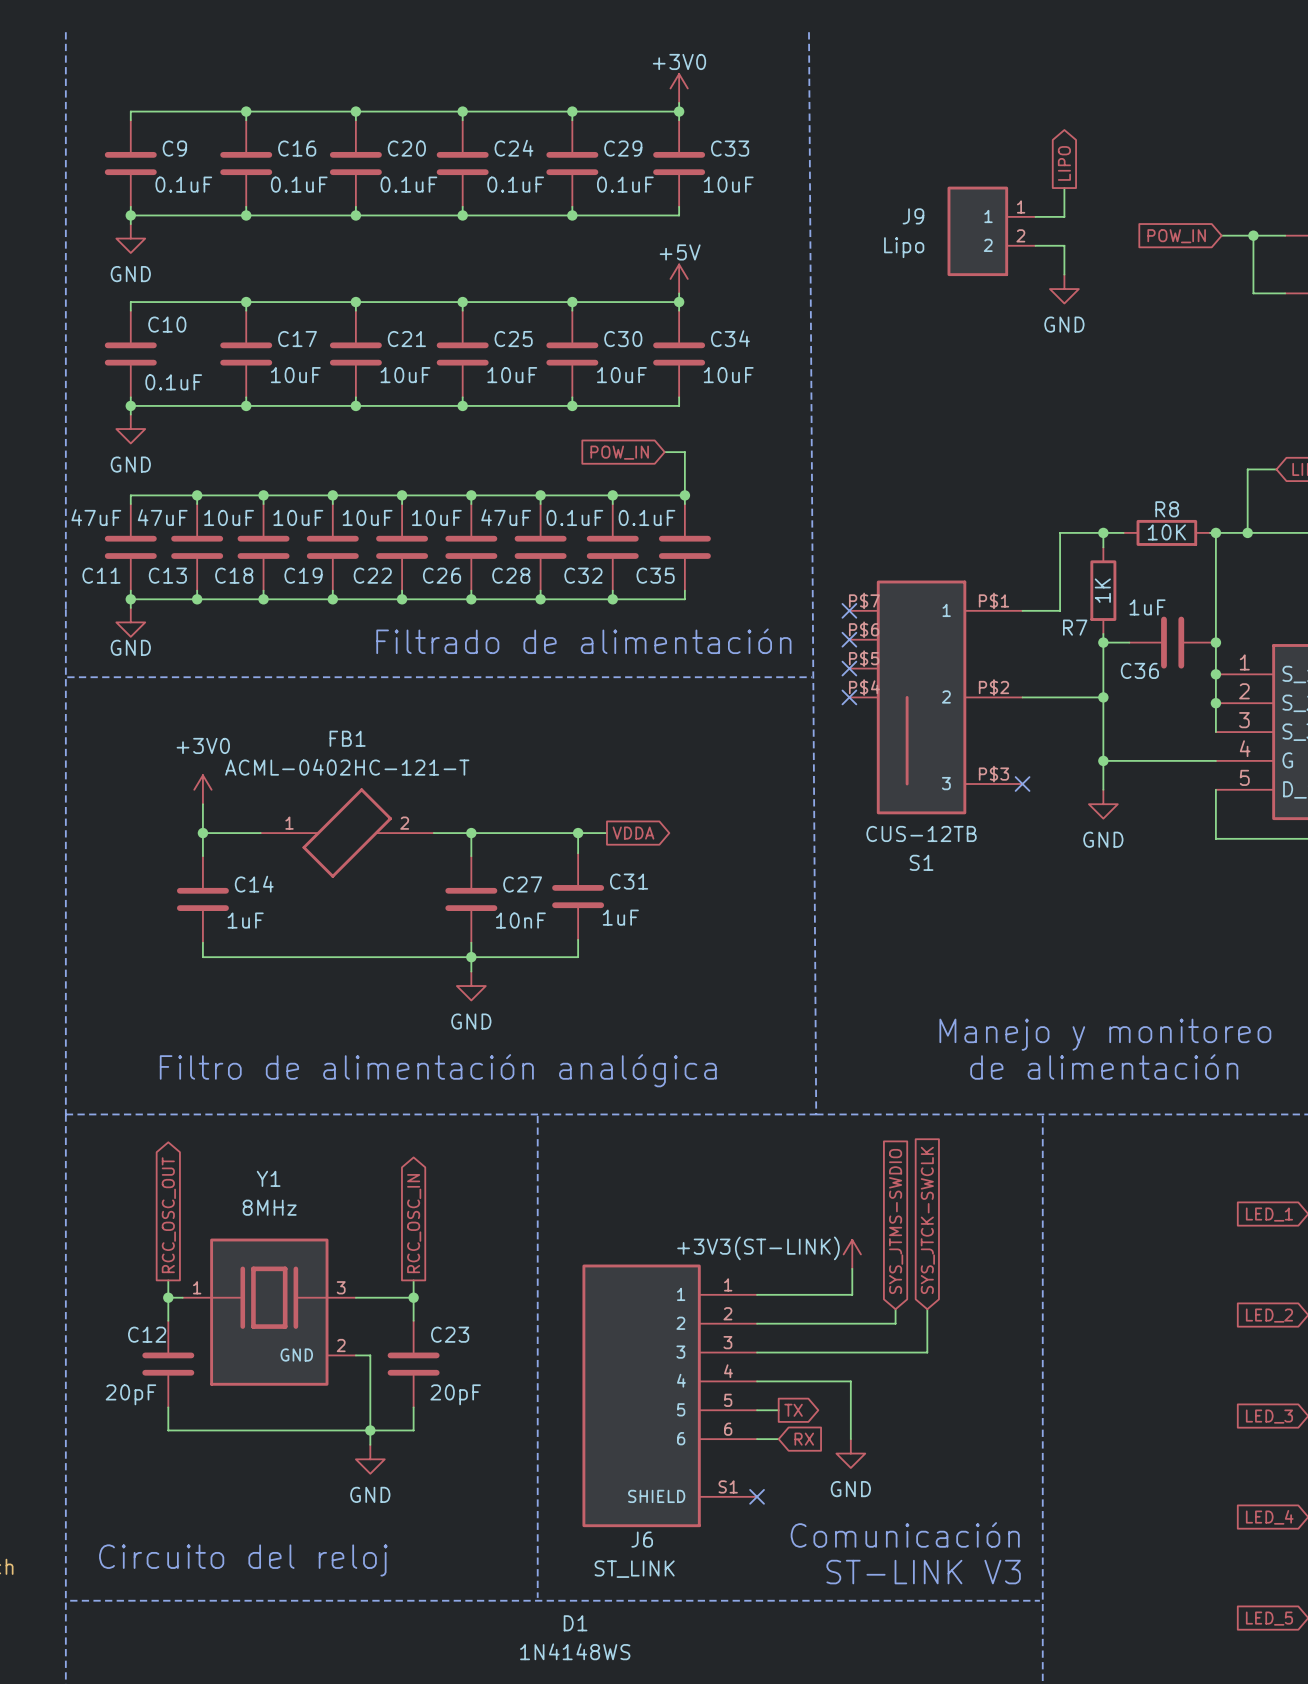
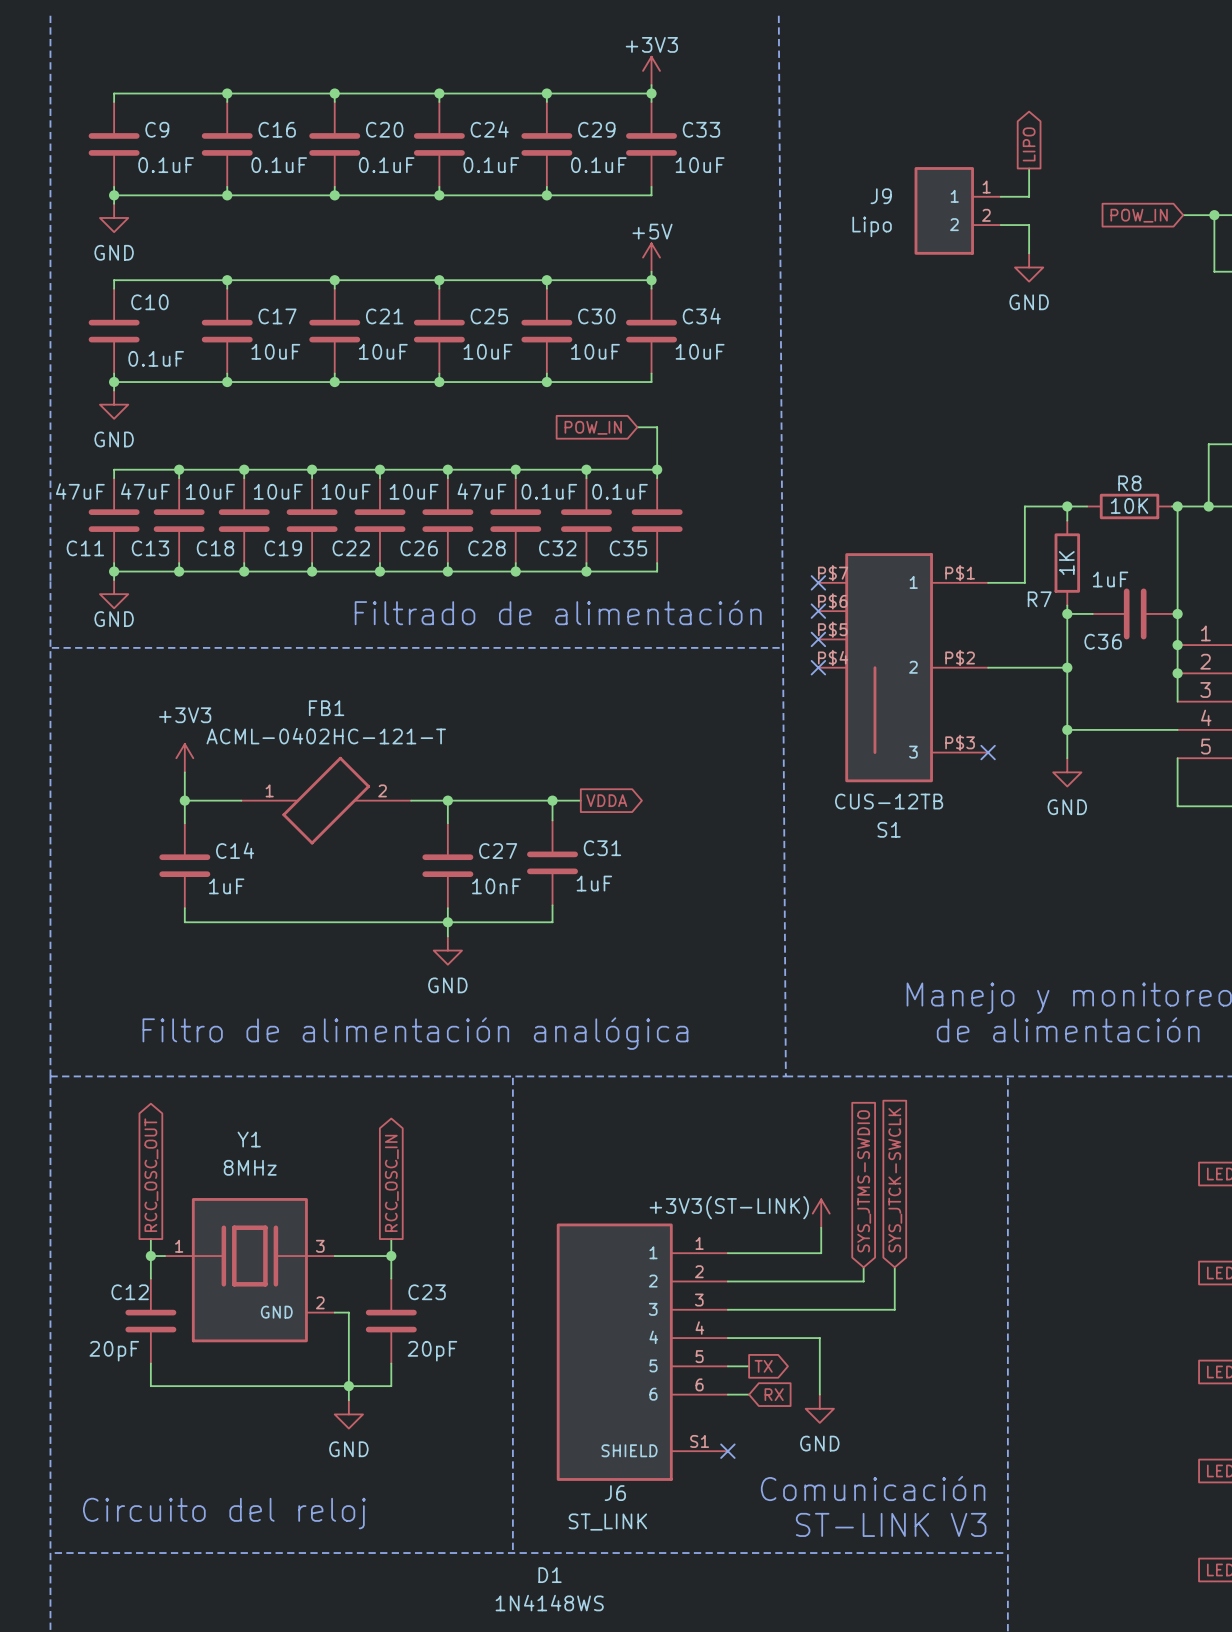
power symbol: +3V0 (679, 88) -> +3V3 (651, 70)
power symbol: +3V0 (202, 789) -> +3V3 (184, 758)

